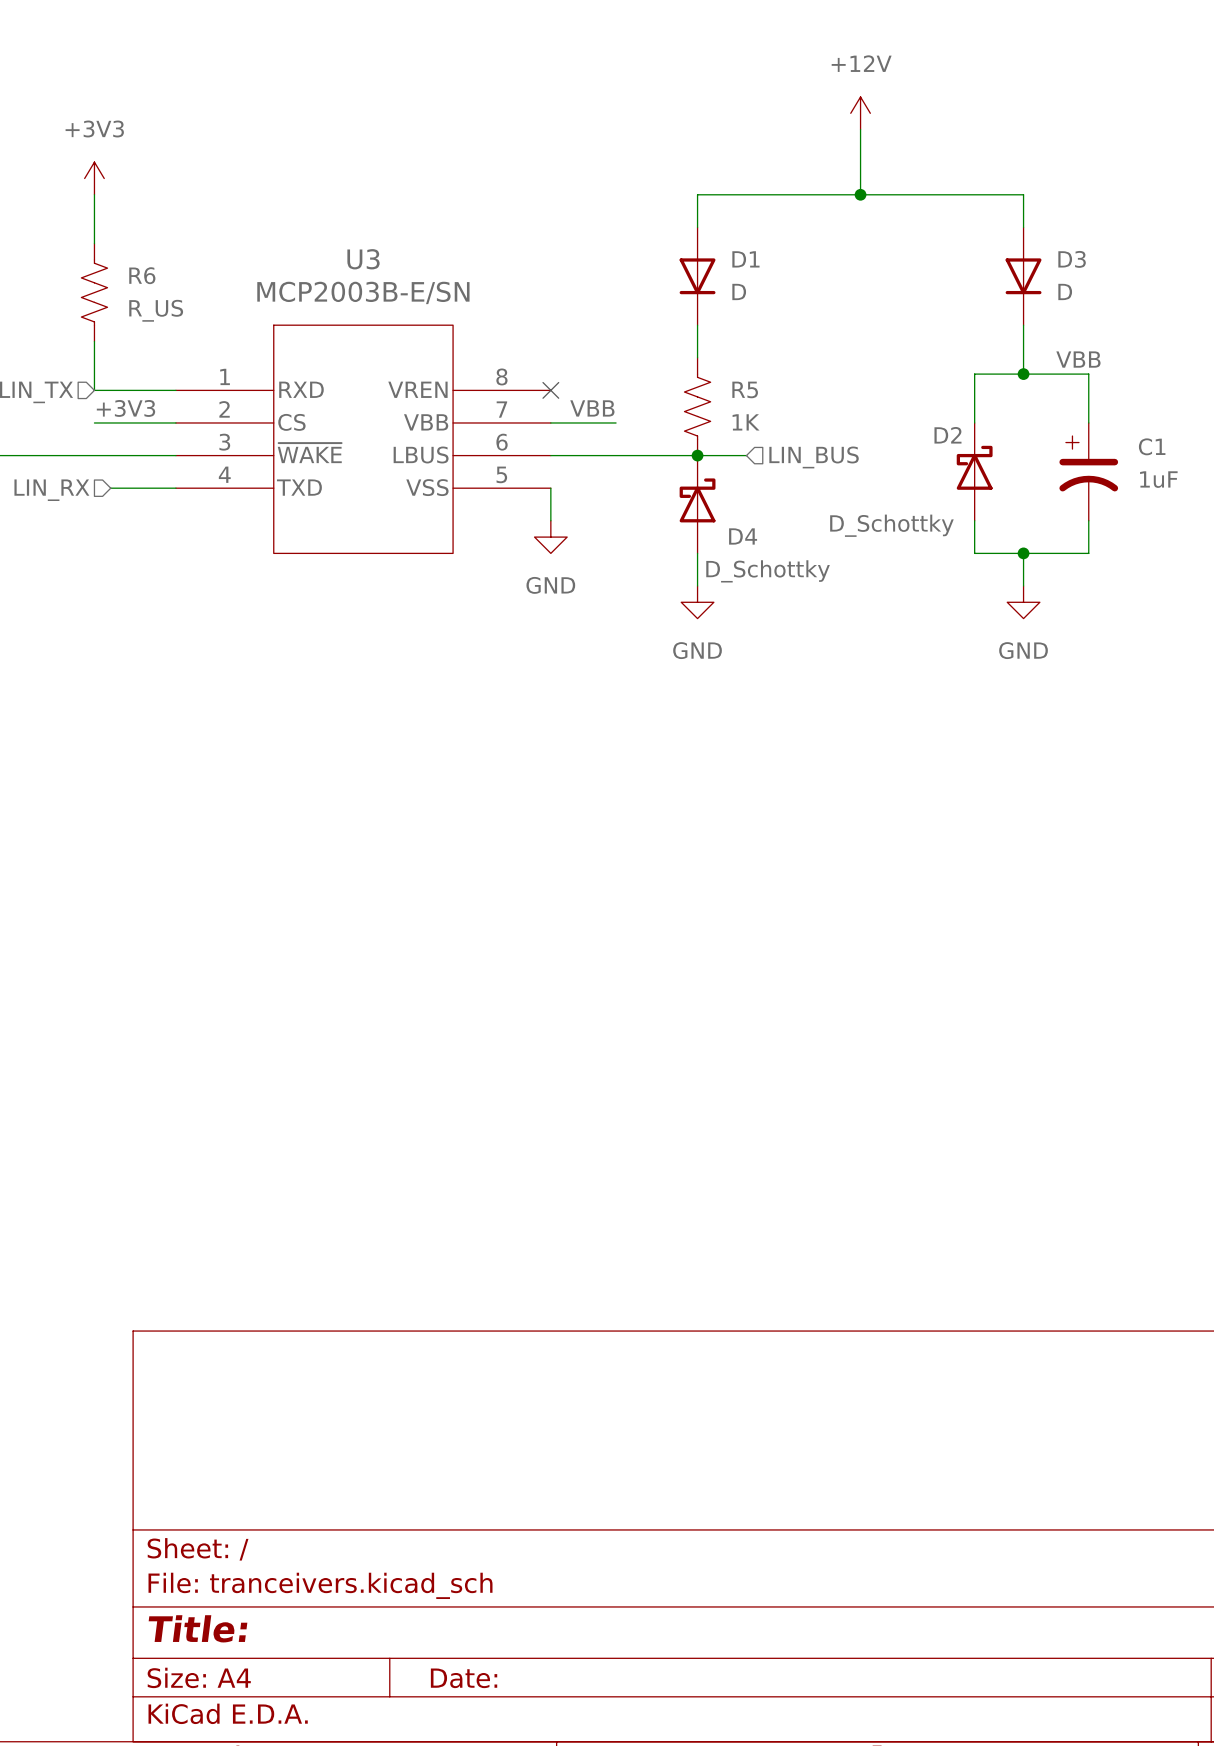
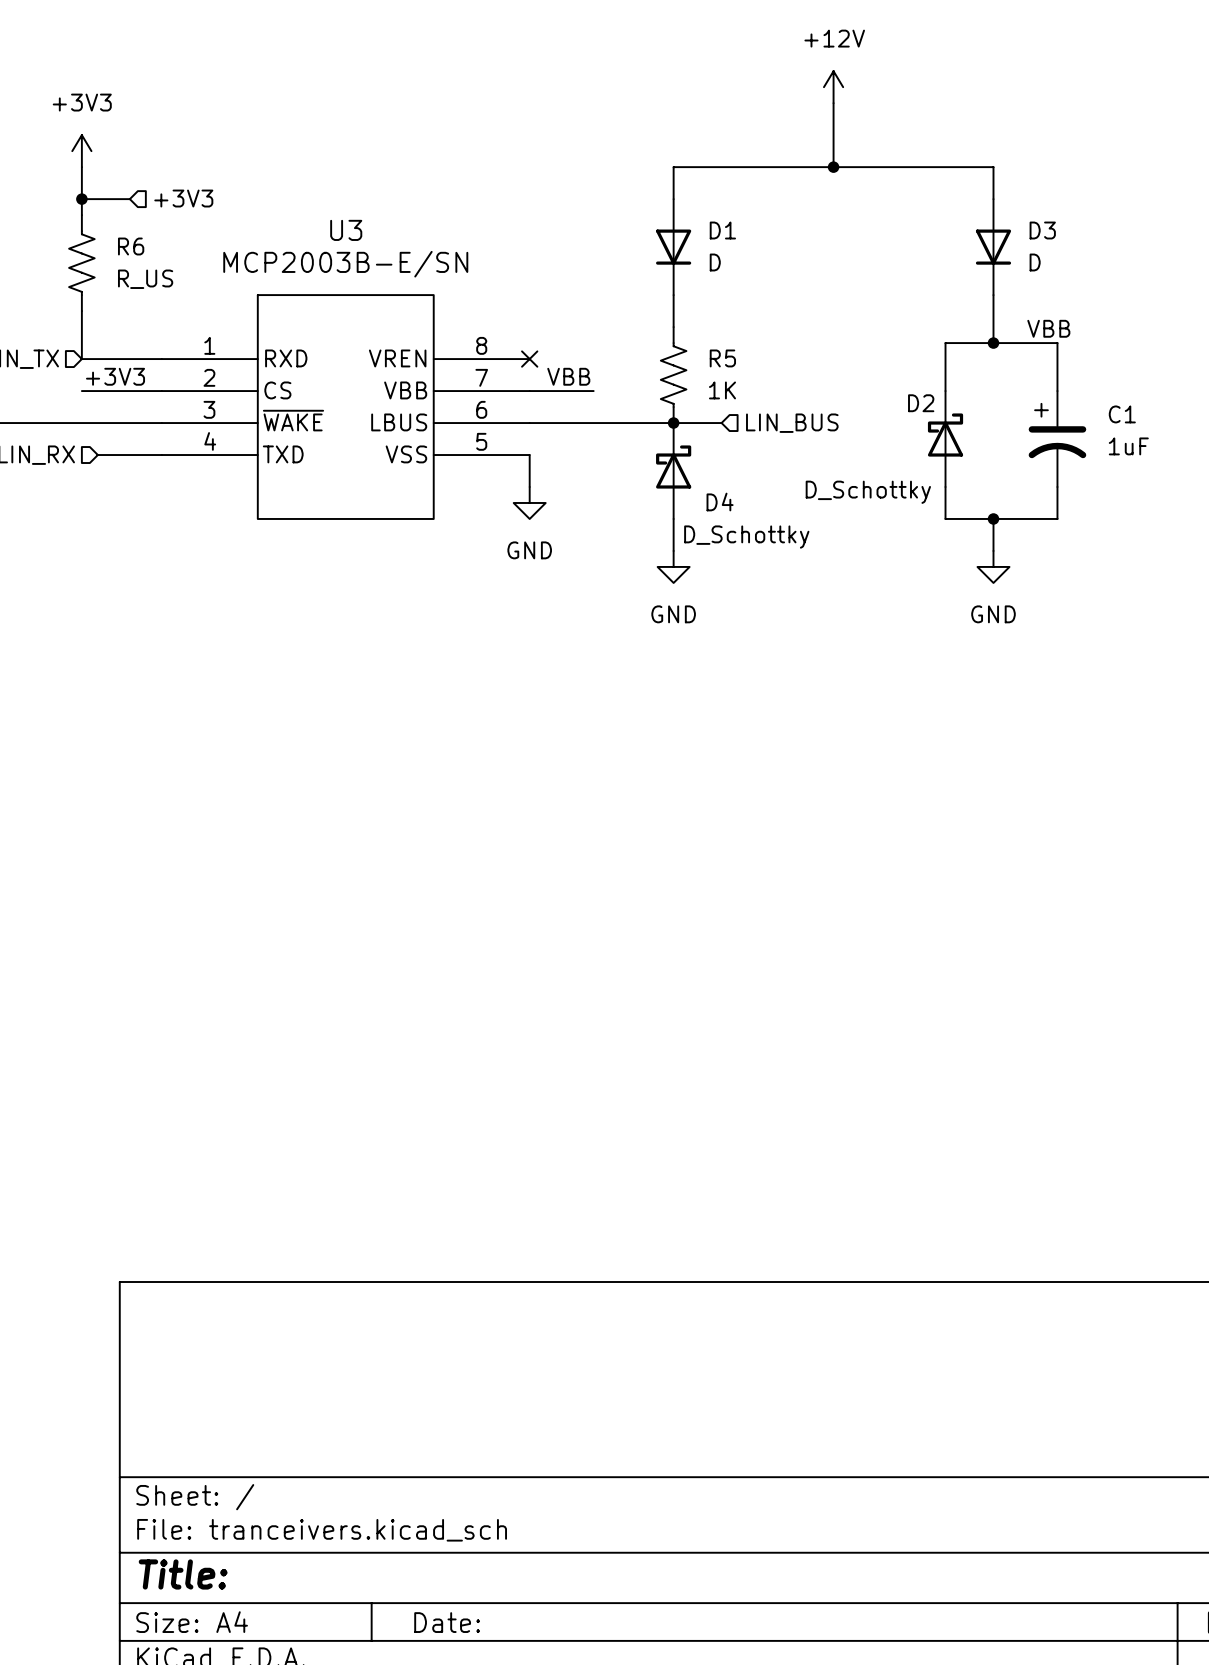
hierarchical label: none -> +3V3 (183, 198)
wire: none -> (81, 199) (129, 199)
junction: none -> (81, 199)

